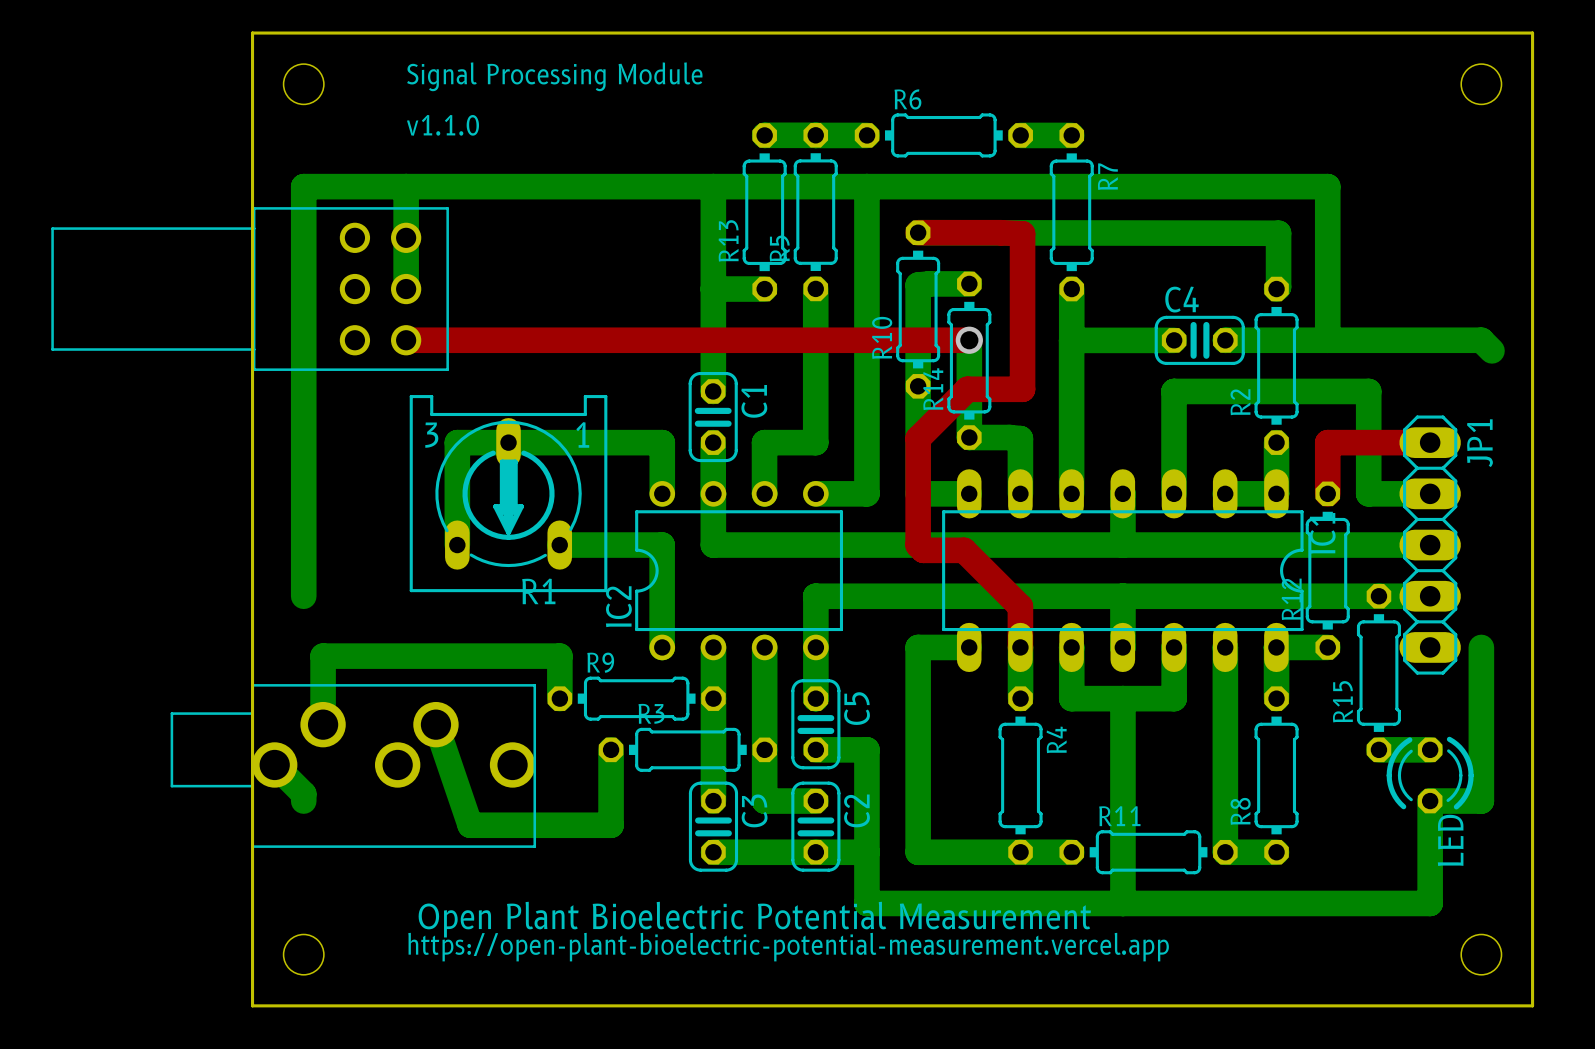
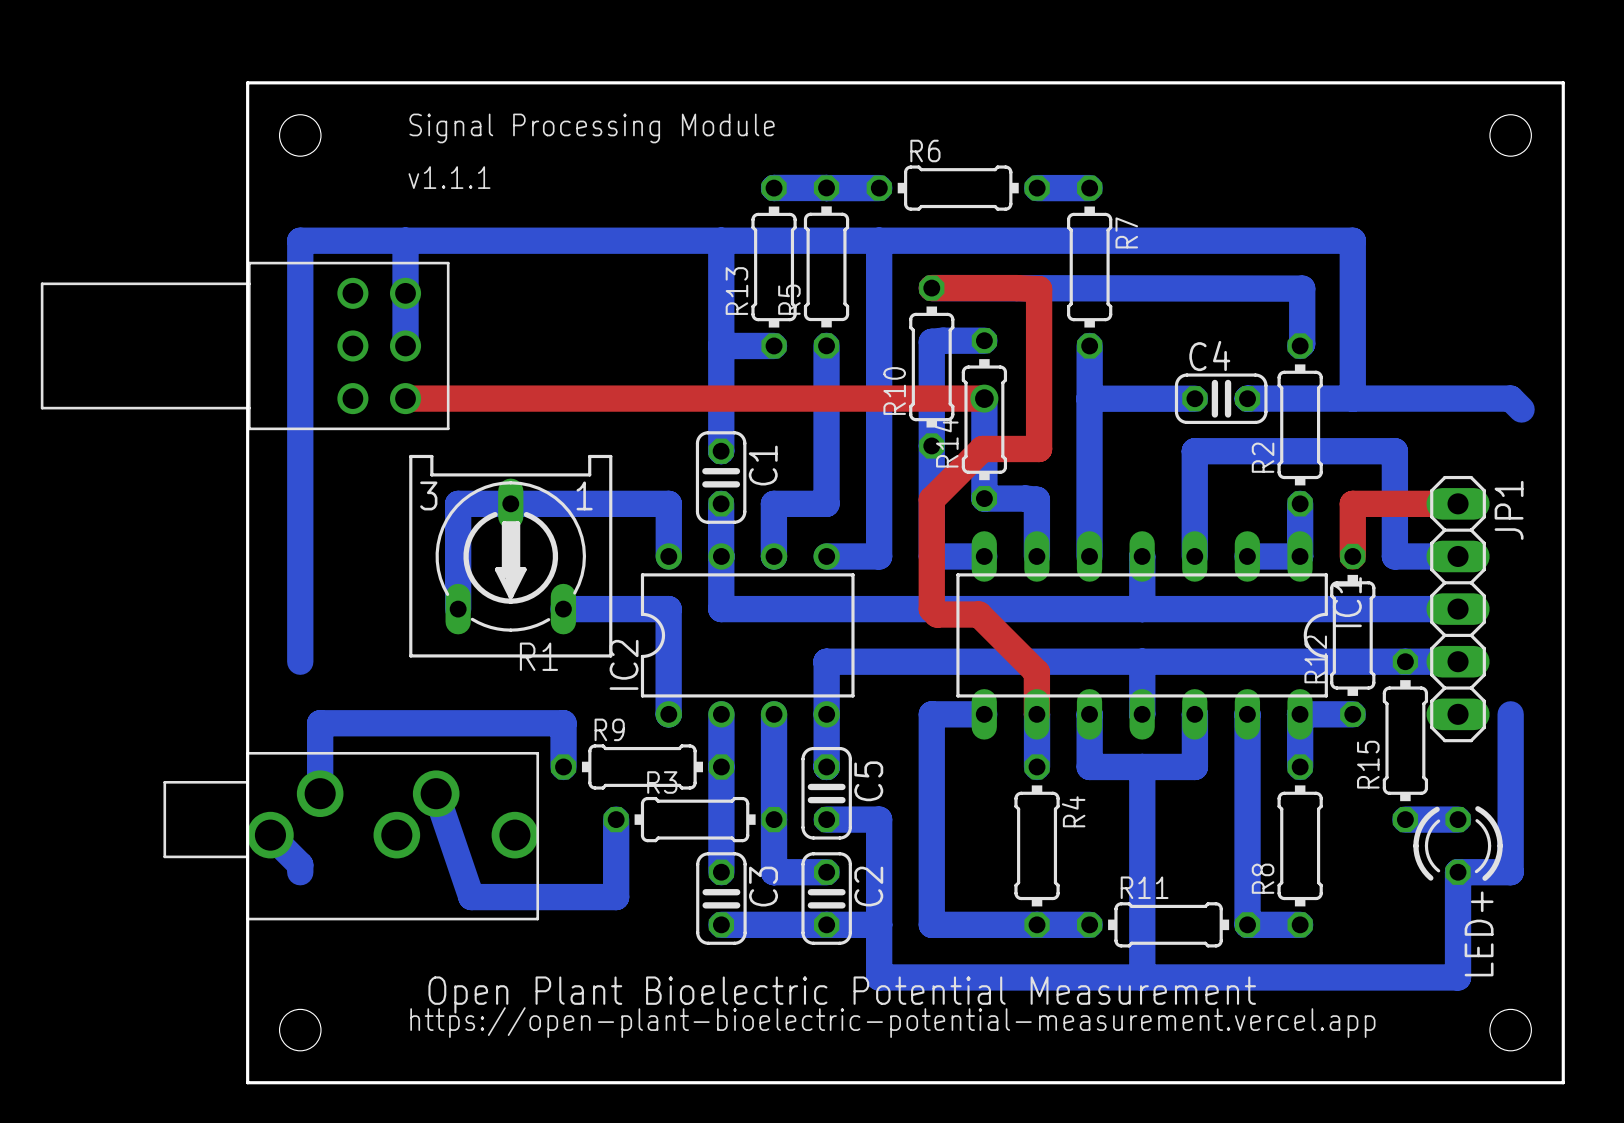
text: v1.1.0 (443, 125) -> v1.1.1 (449, 177)
LED name: LED (1450, 840) -> LED+ (1479, 933)

